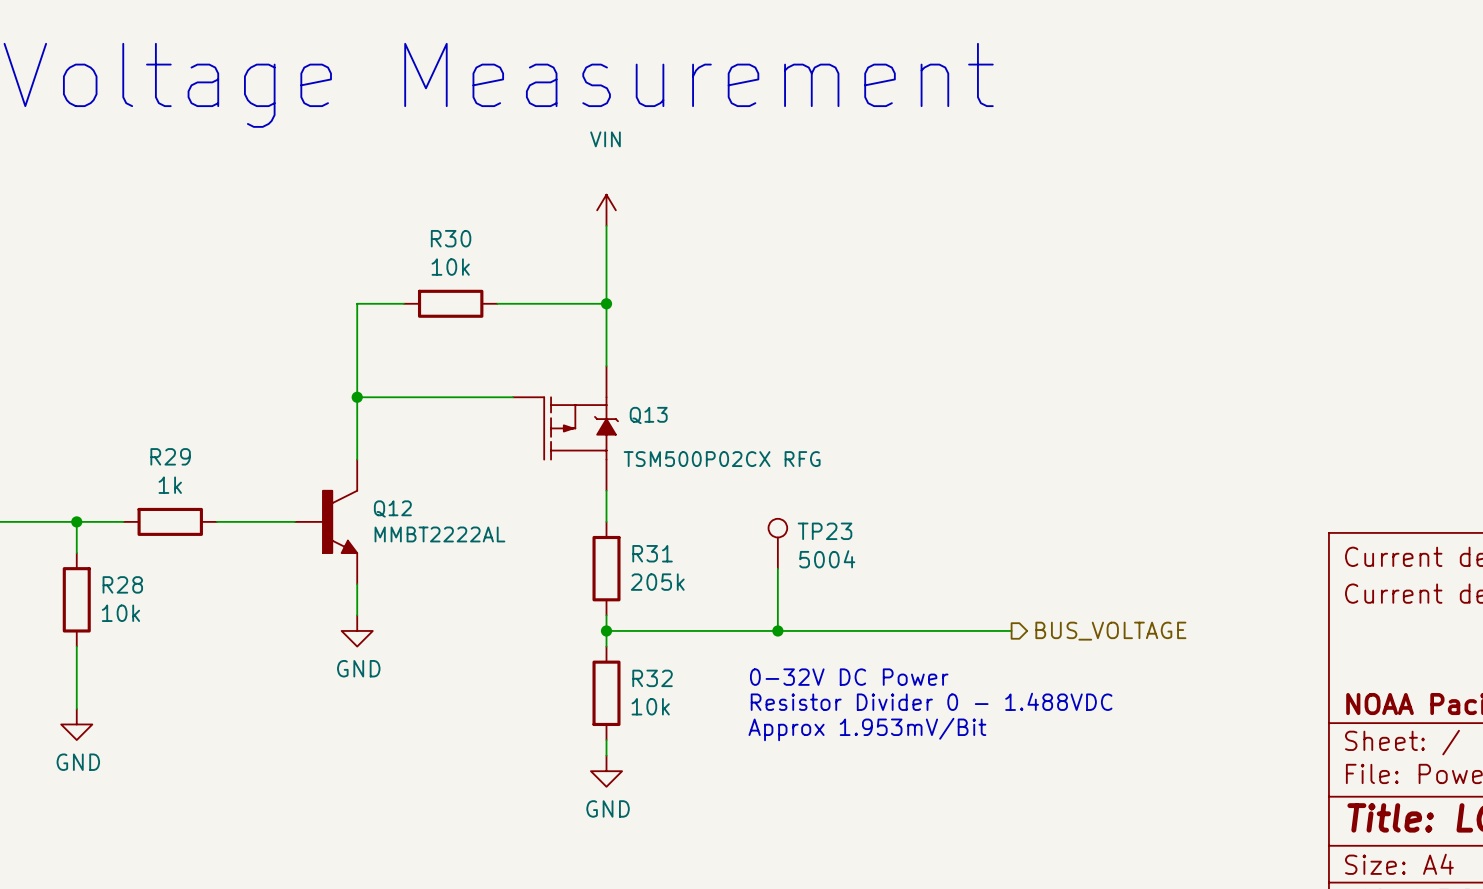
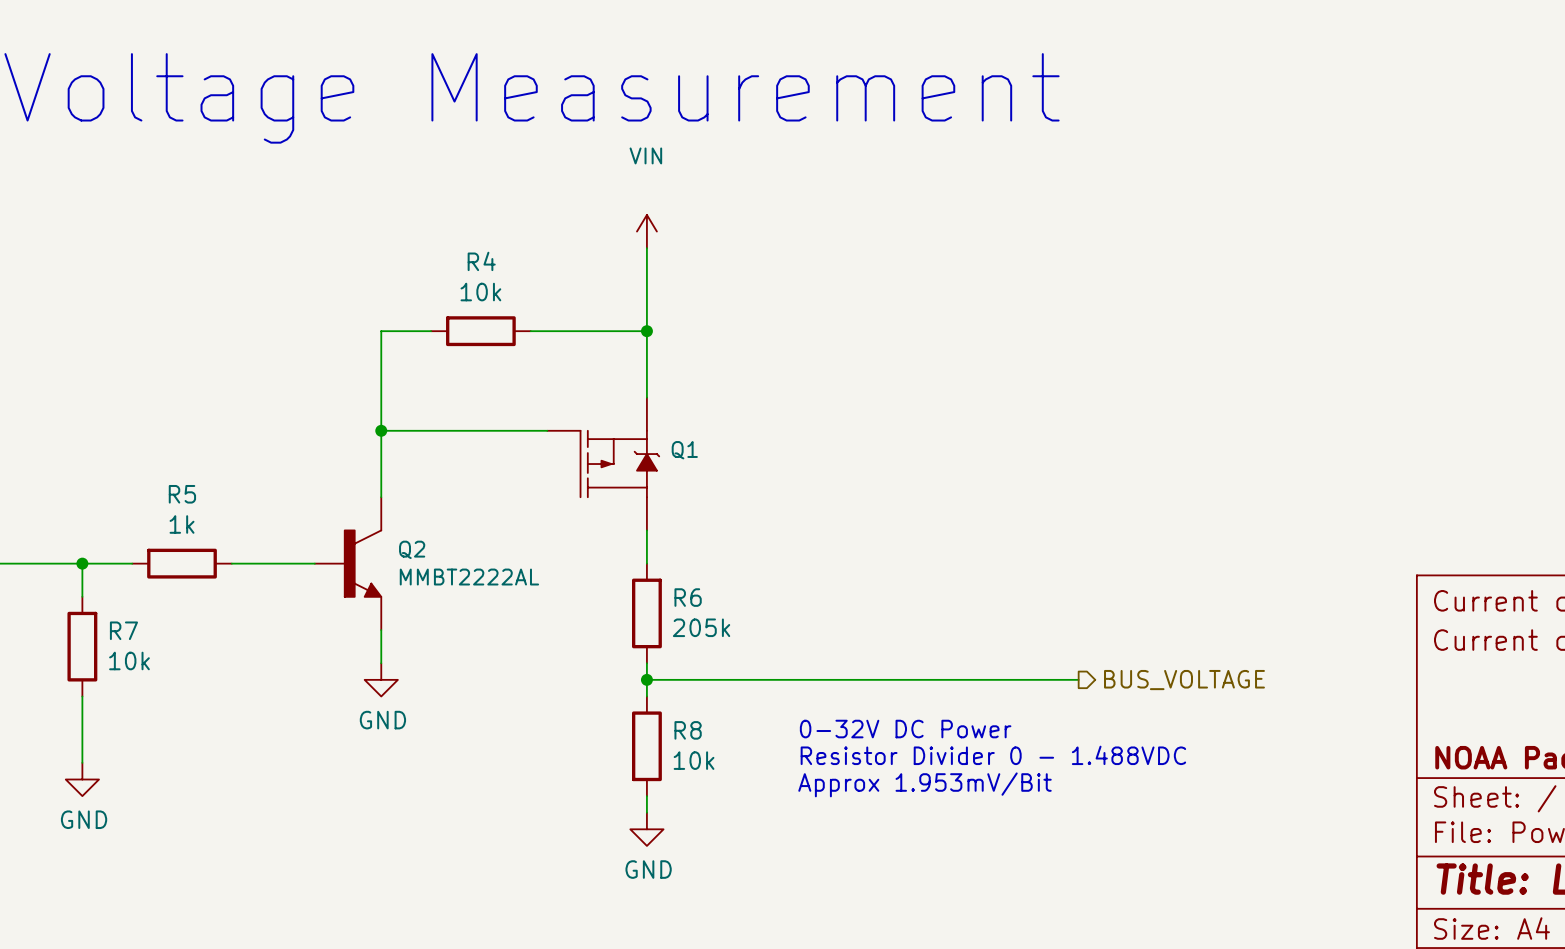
R30 name: R30 (451, 238) -> R4 (481, 261)
Q13 name: Q13 (648, 415) -> Q1 (684, 450)
R29 name: R29 (170, 456) -> R5 (182, 494)
Q13 value: TSM500P02CX RFG (722, 459) -> none
Q12 name: Q12 (392, 508) -> Q2 (412, 549)
TP23: 5004 (777, 543) -> none
R31 name: R31 (652, 553) -> R6 (688, 597)
wire: (777, 568) (777, 630) -> none
R28 name: R28 (122, 584) -> R7 (123, 630)
junction: (777, 630) -> none
R32 name: R32 (652, 678) -> R8 (688, 730)

